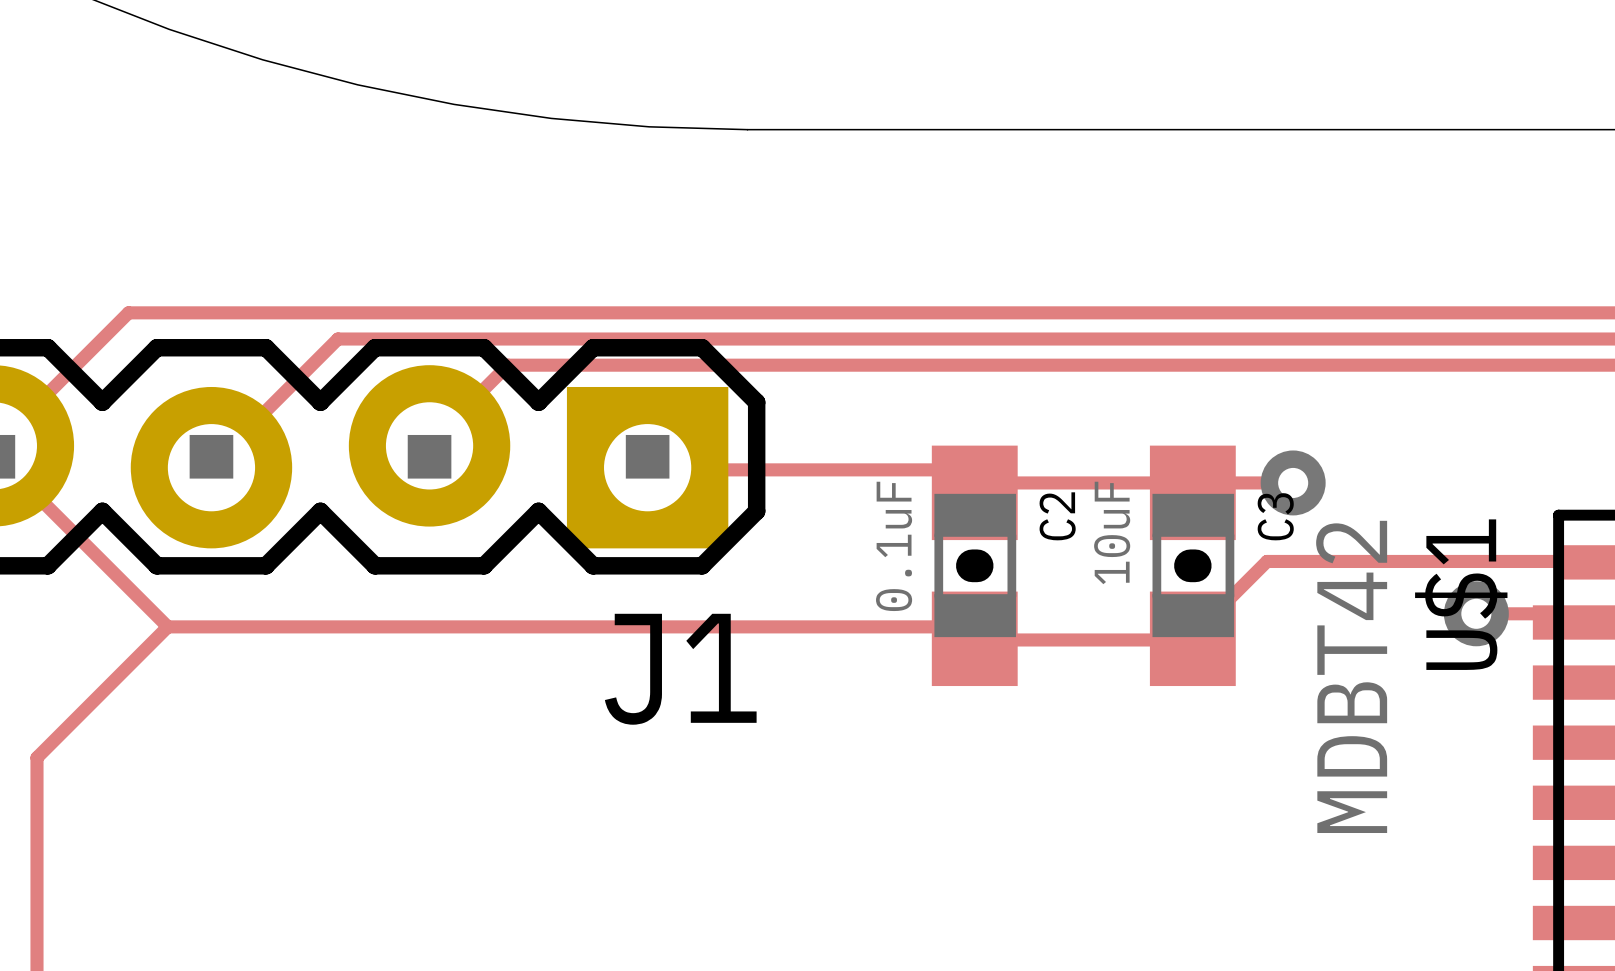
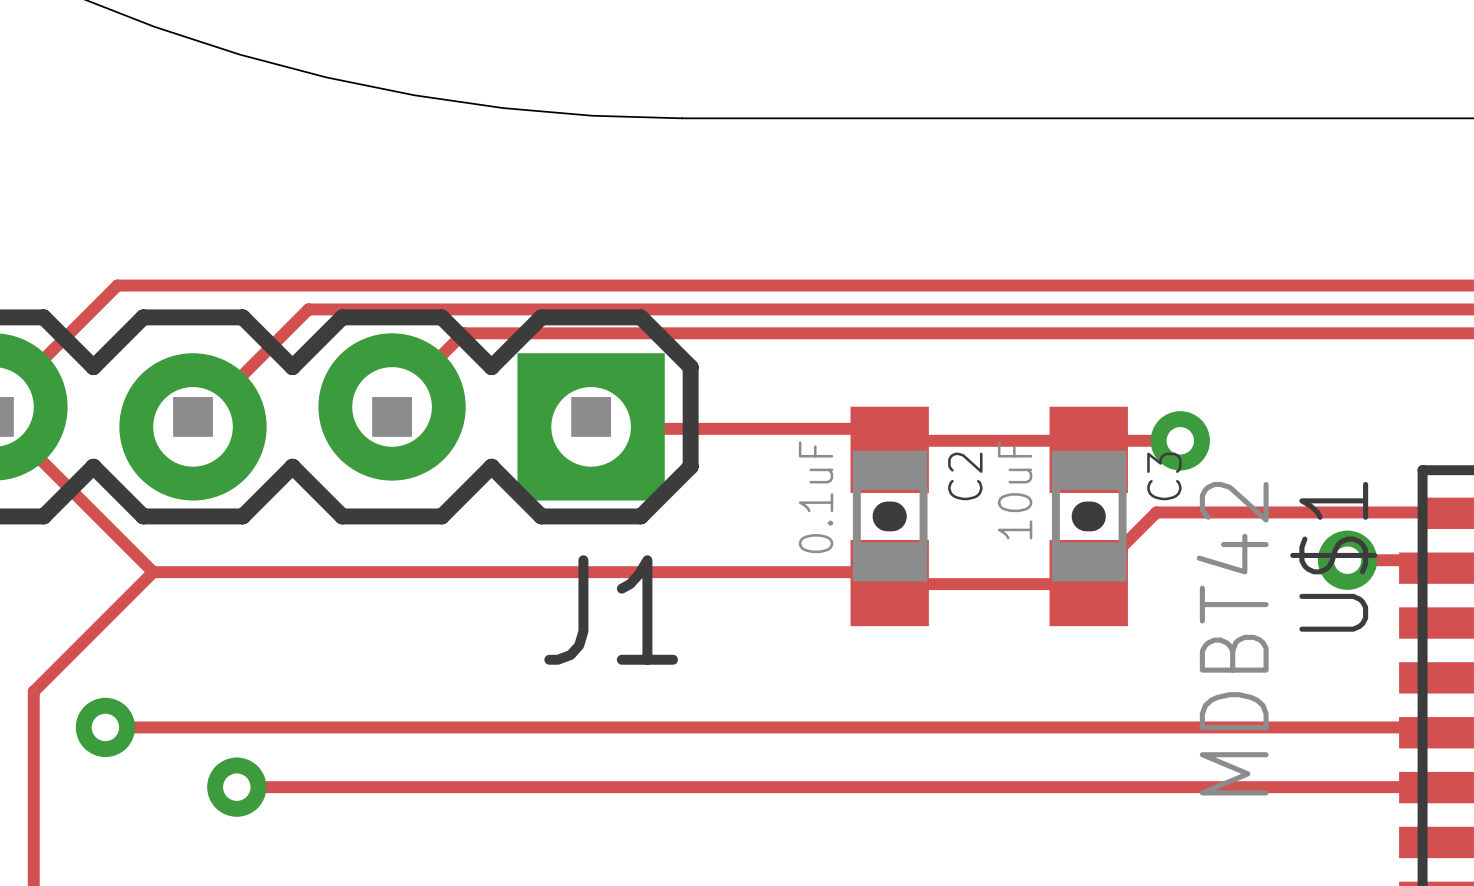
track: none -> (105, 727) (1443, 727) (1453, 732)
via: none -> (105, 727)
track: none -> (236, 787) (1453, 787)
via: none -> (236, 787)

